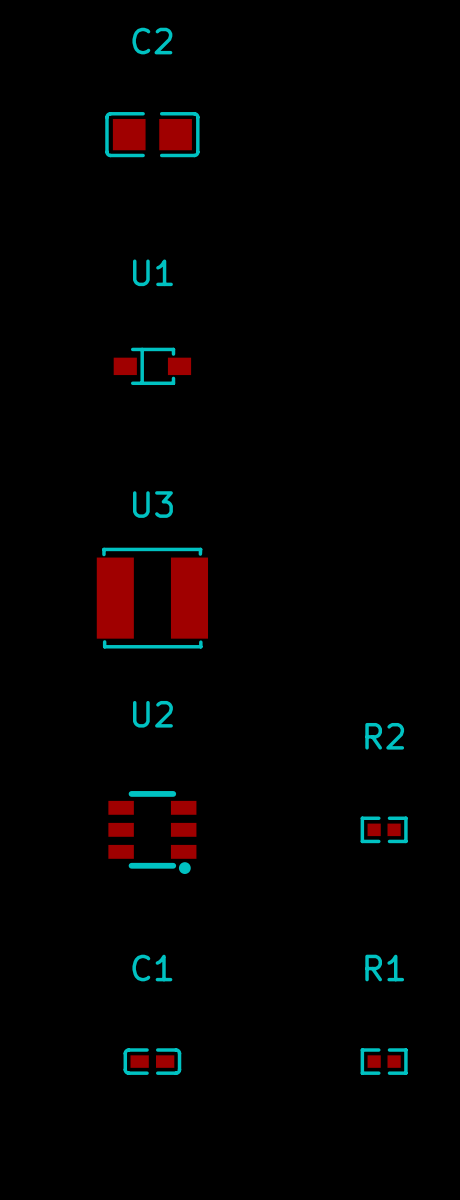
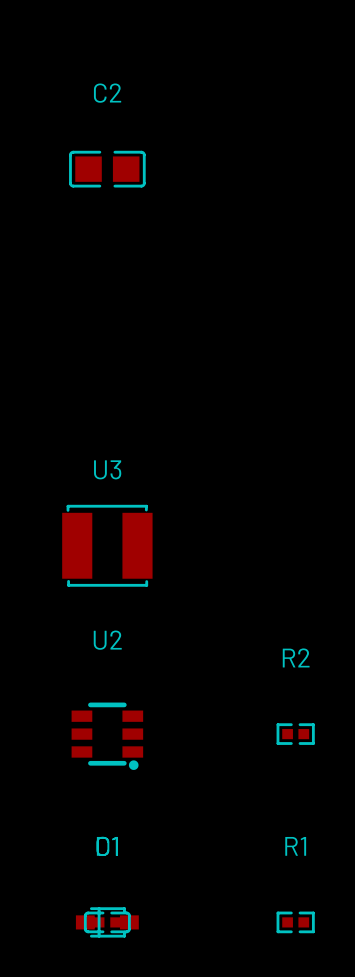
U1: (152, 366) -> none
part: none -> (107, 922)

